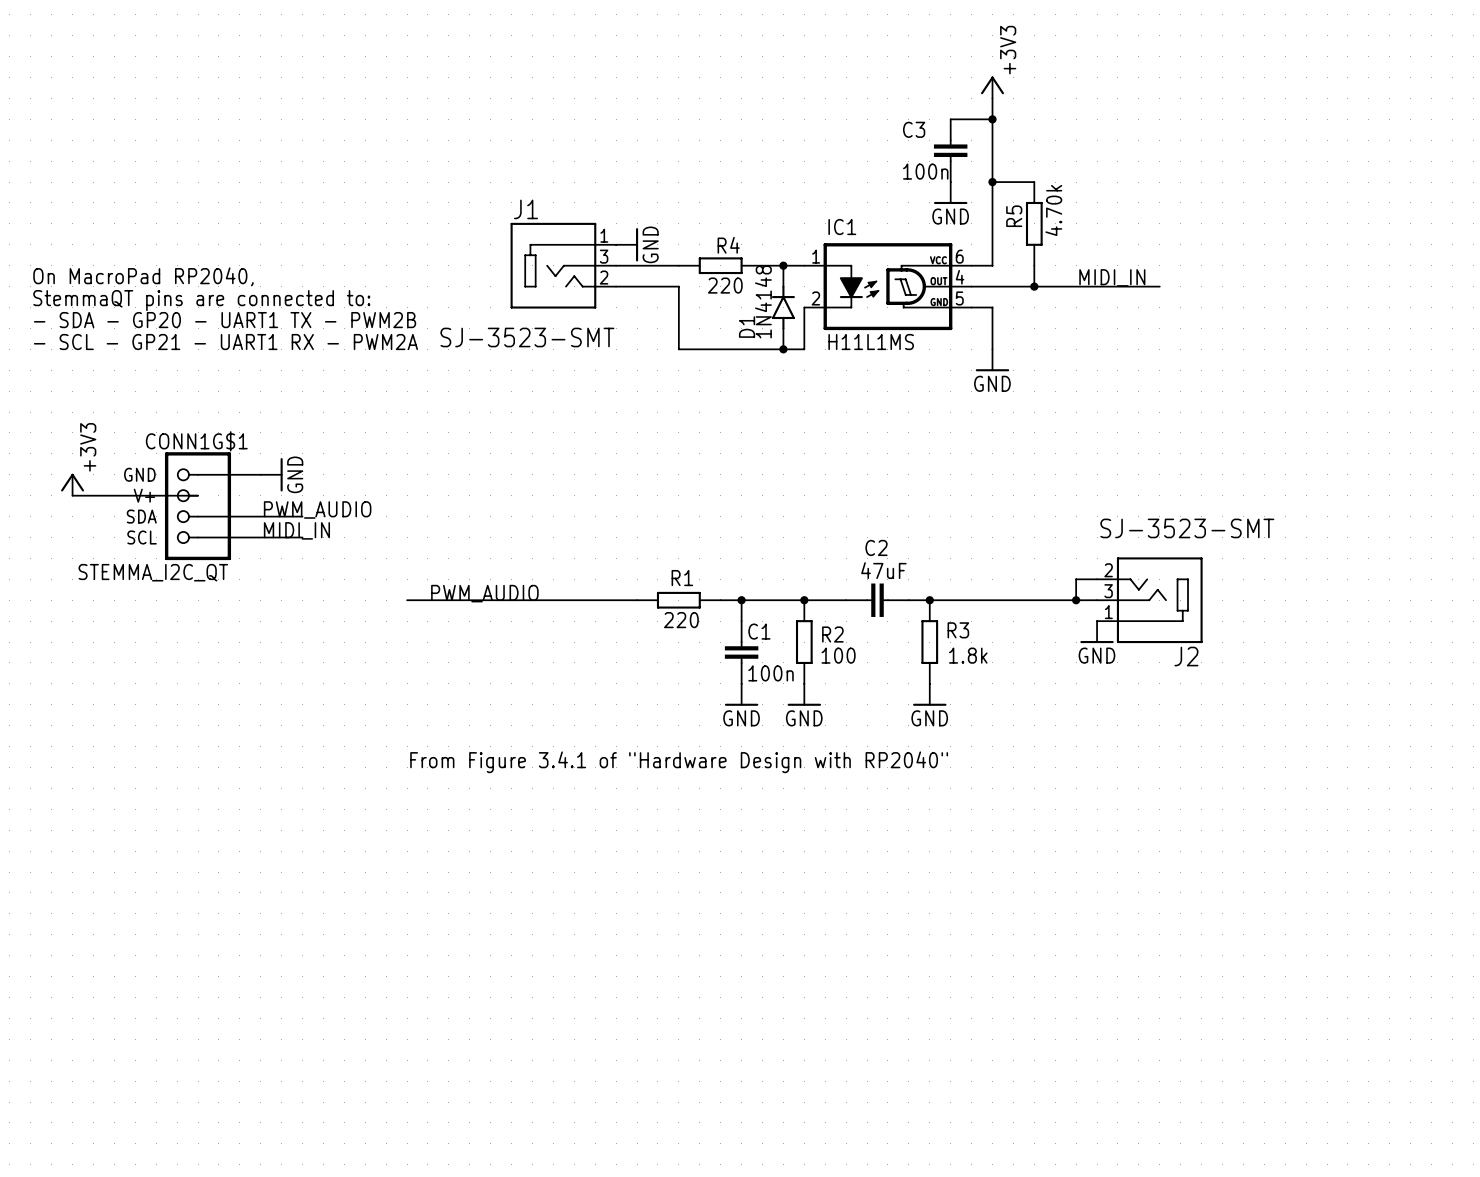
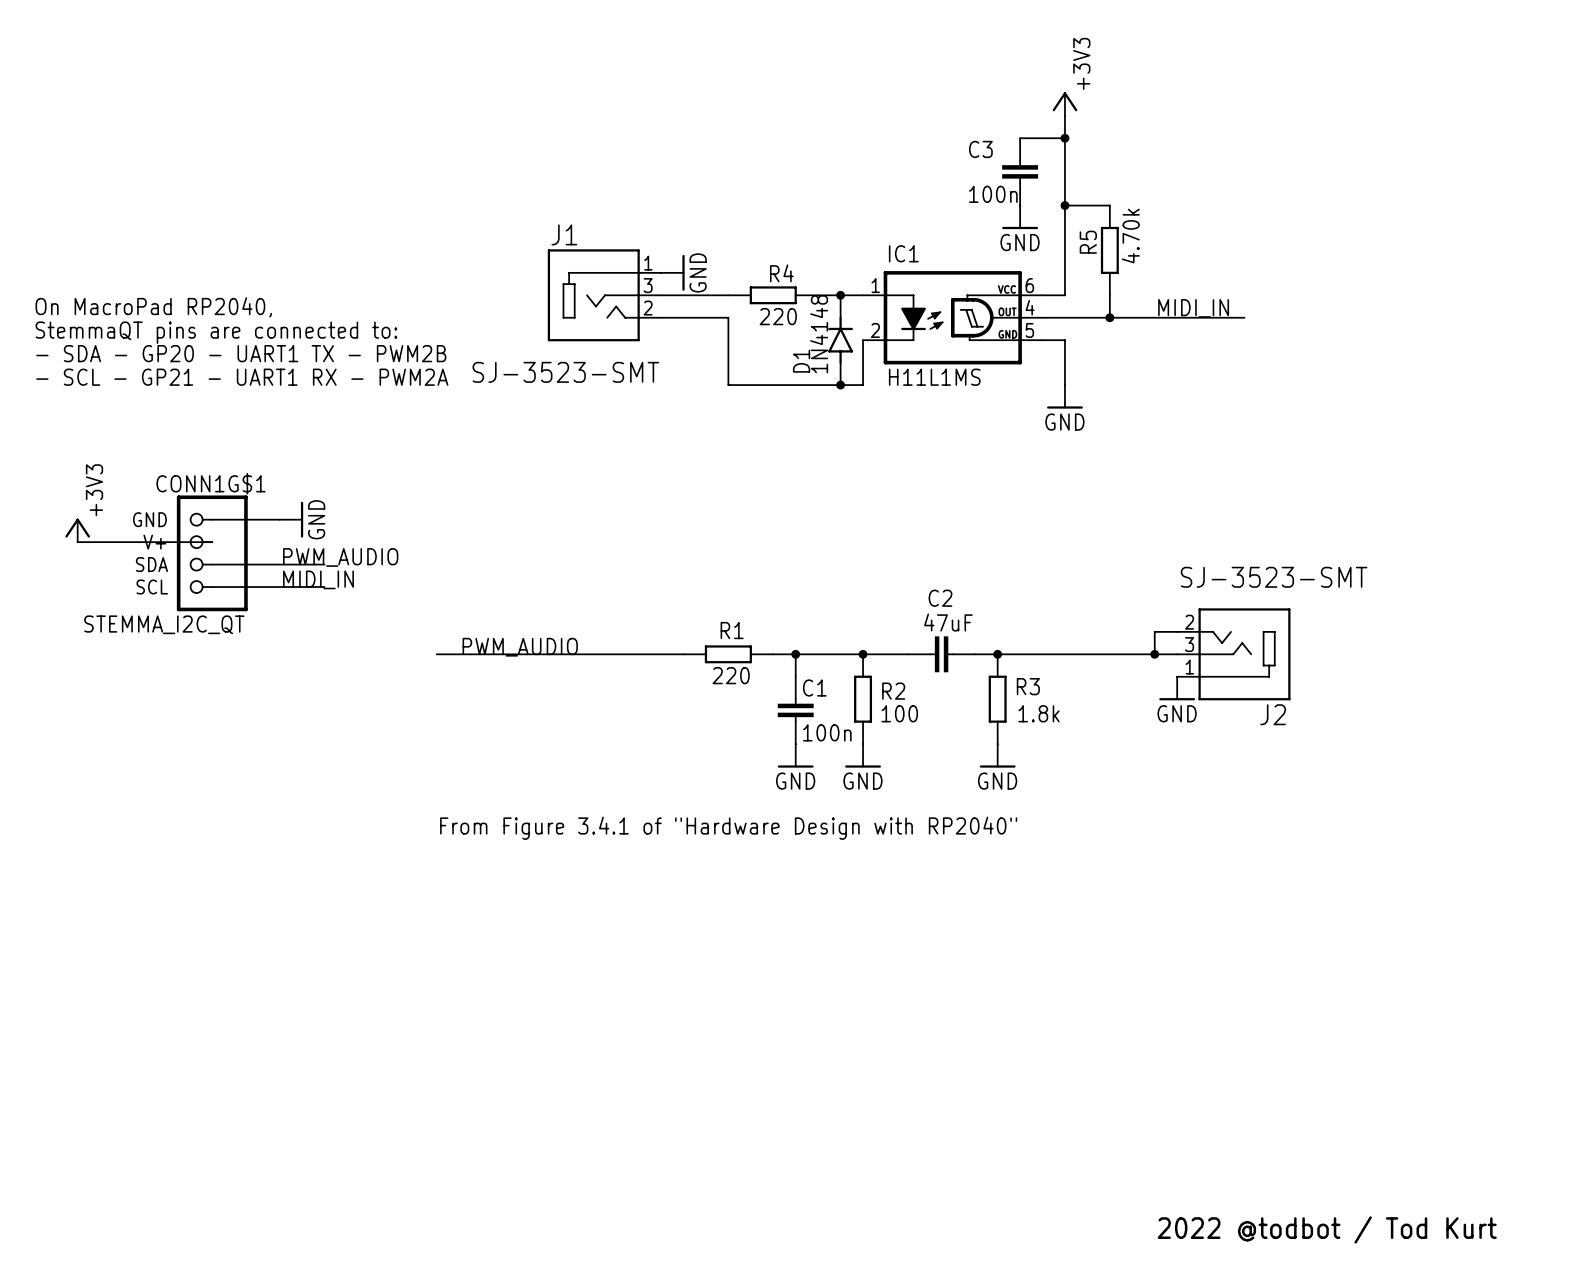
text: none -> 2022 @todbot / Tod Kurt (1327, 1229)

